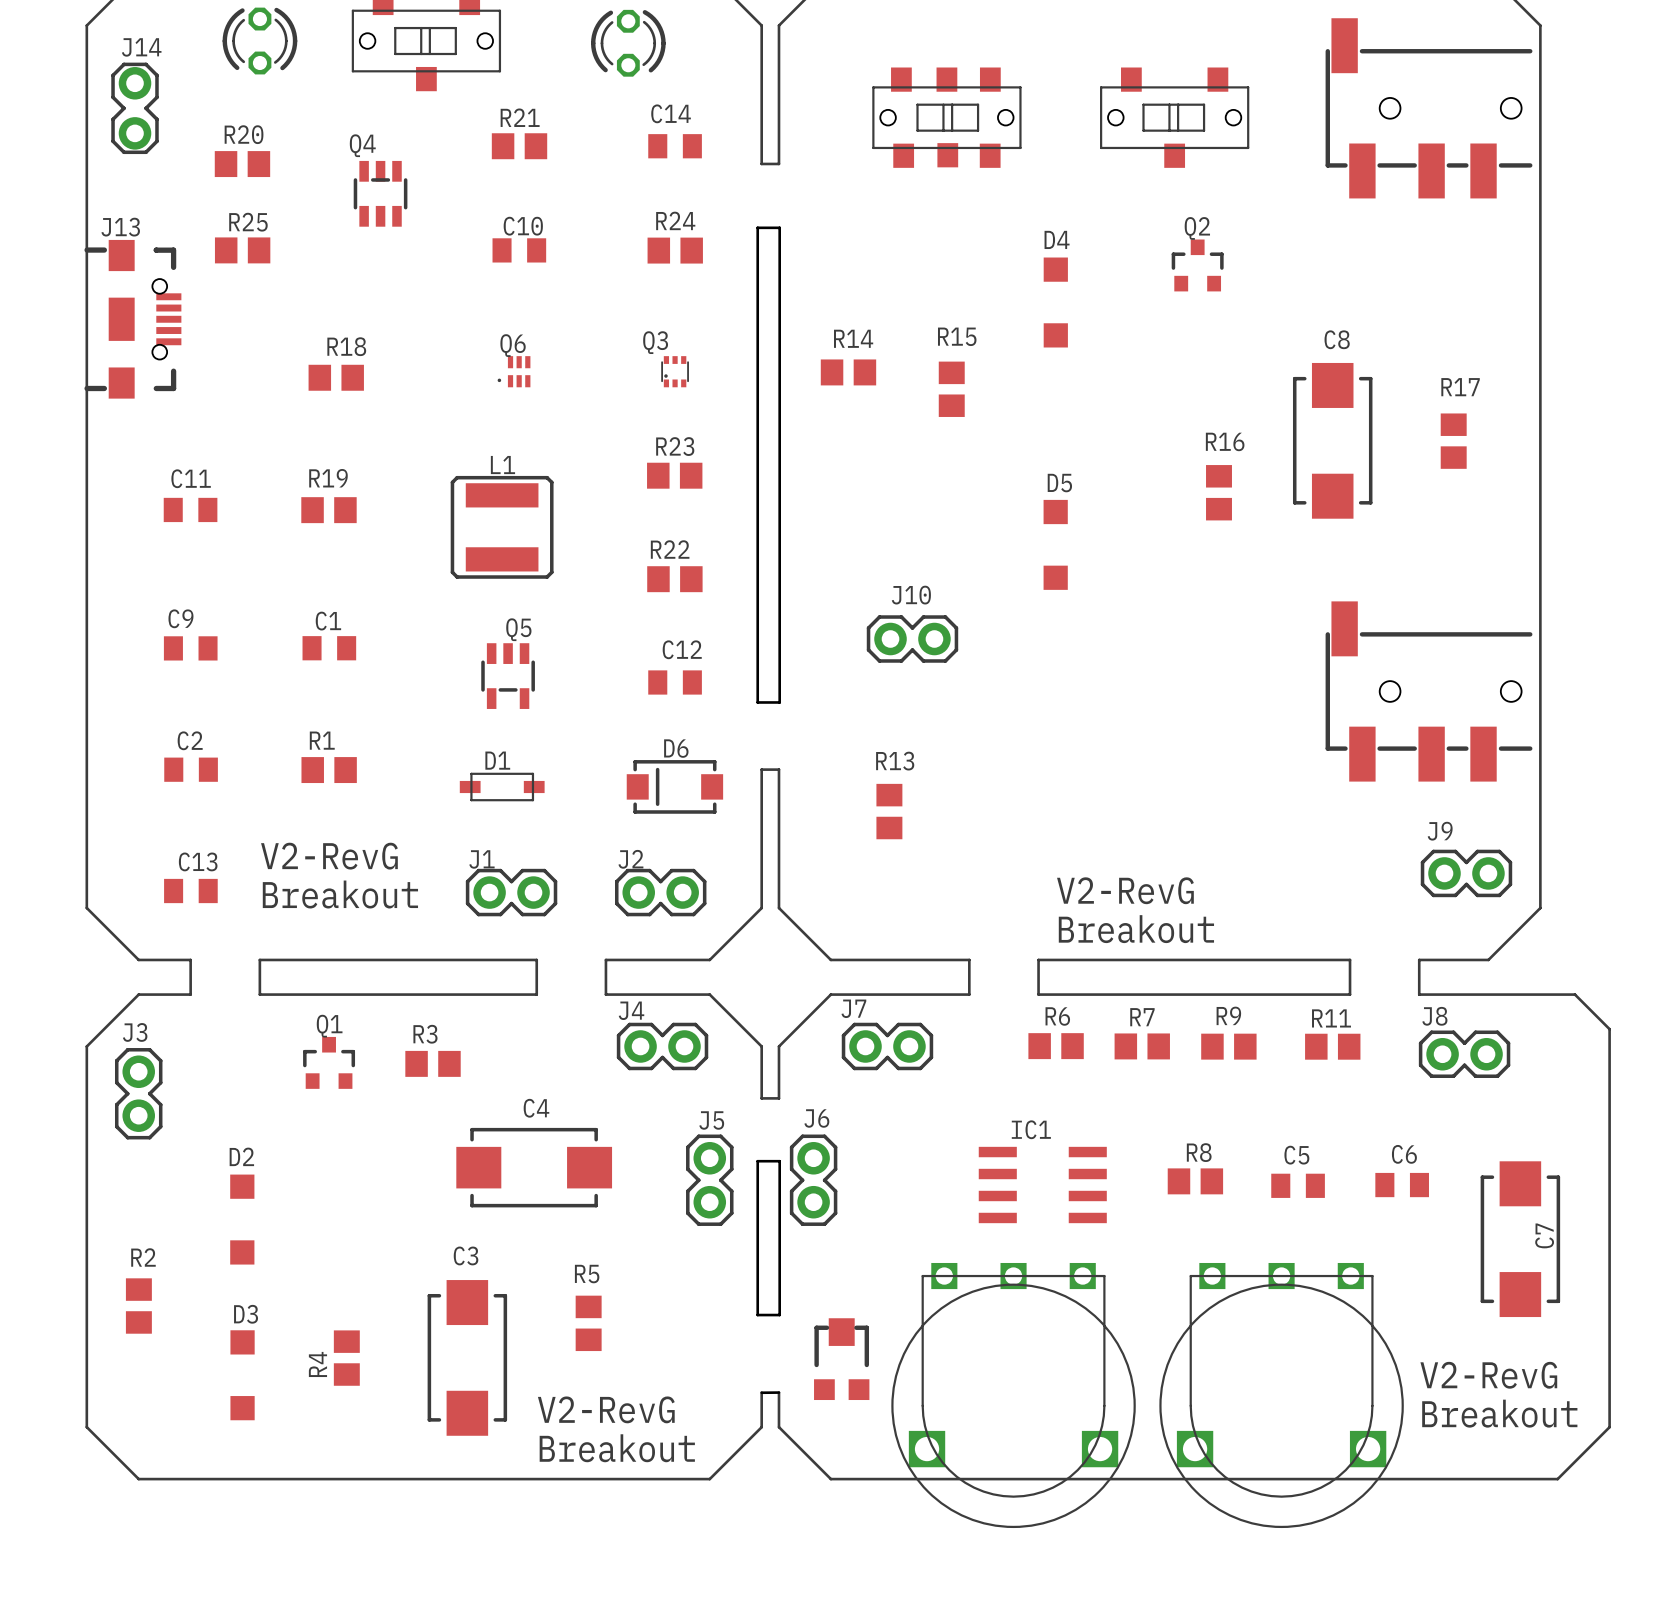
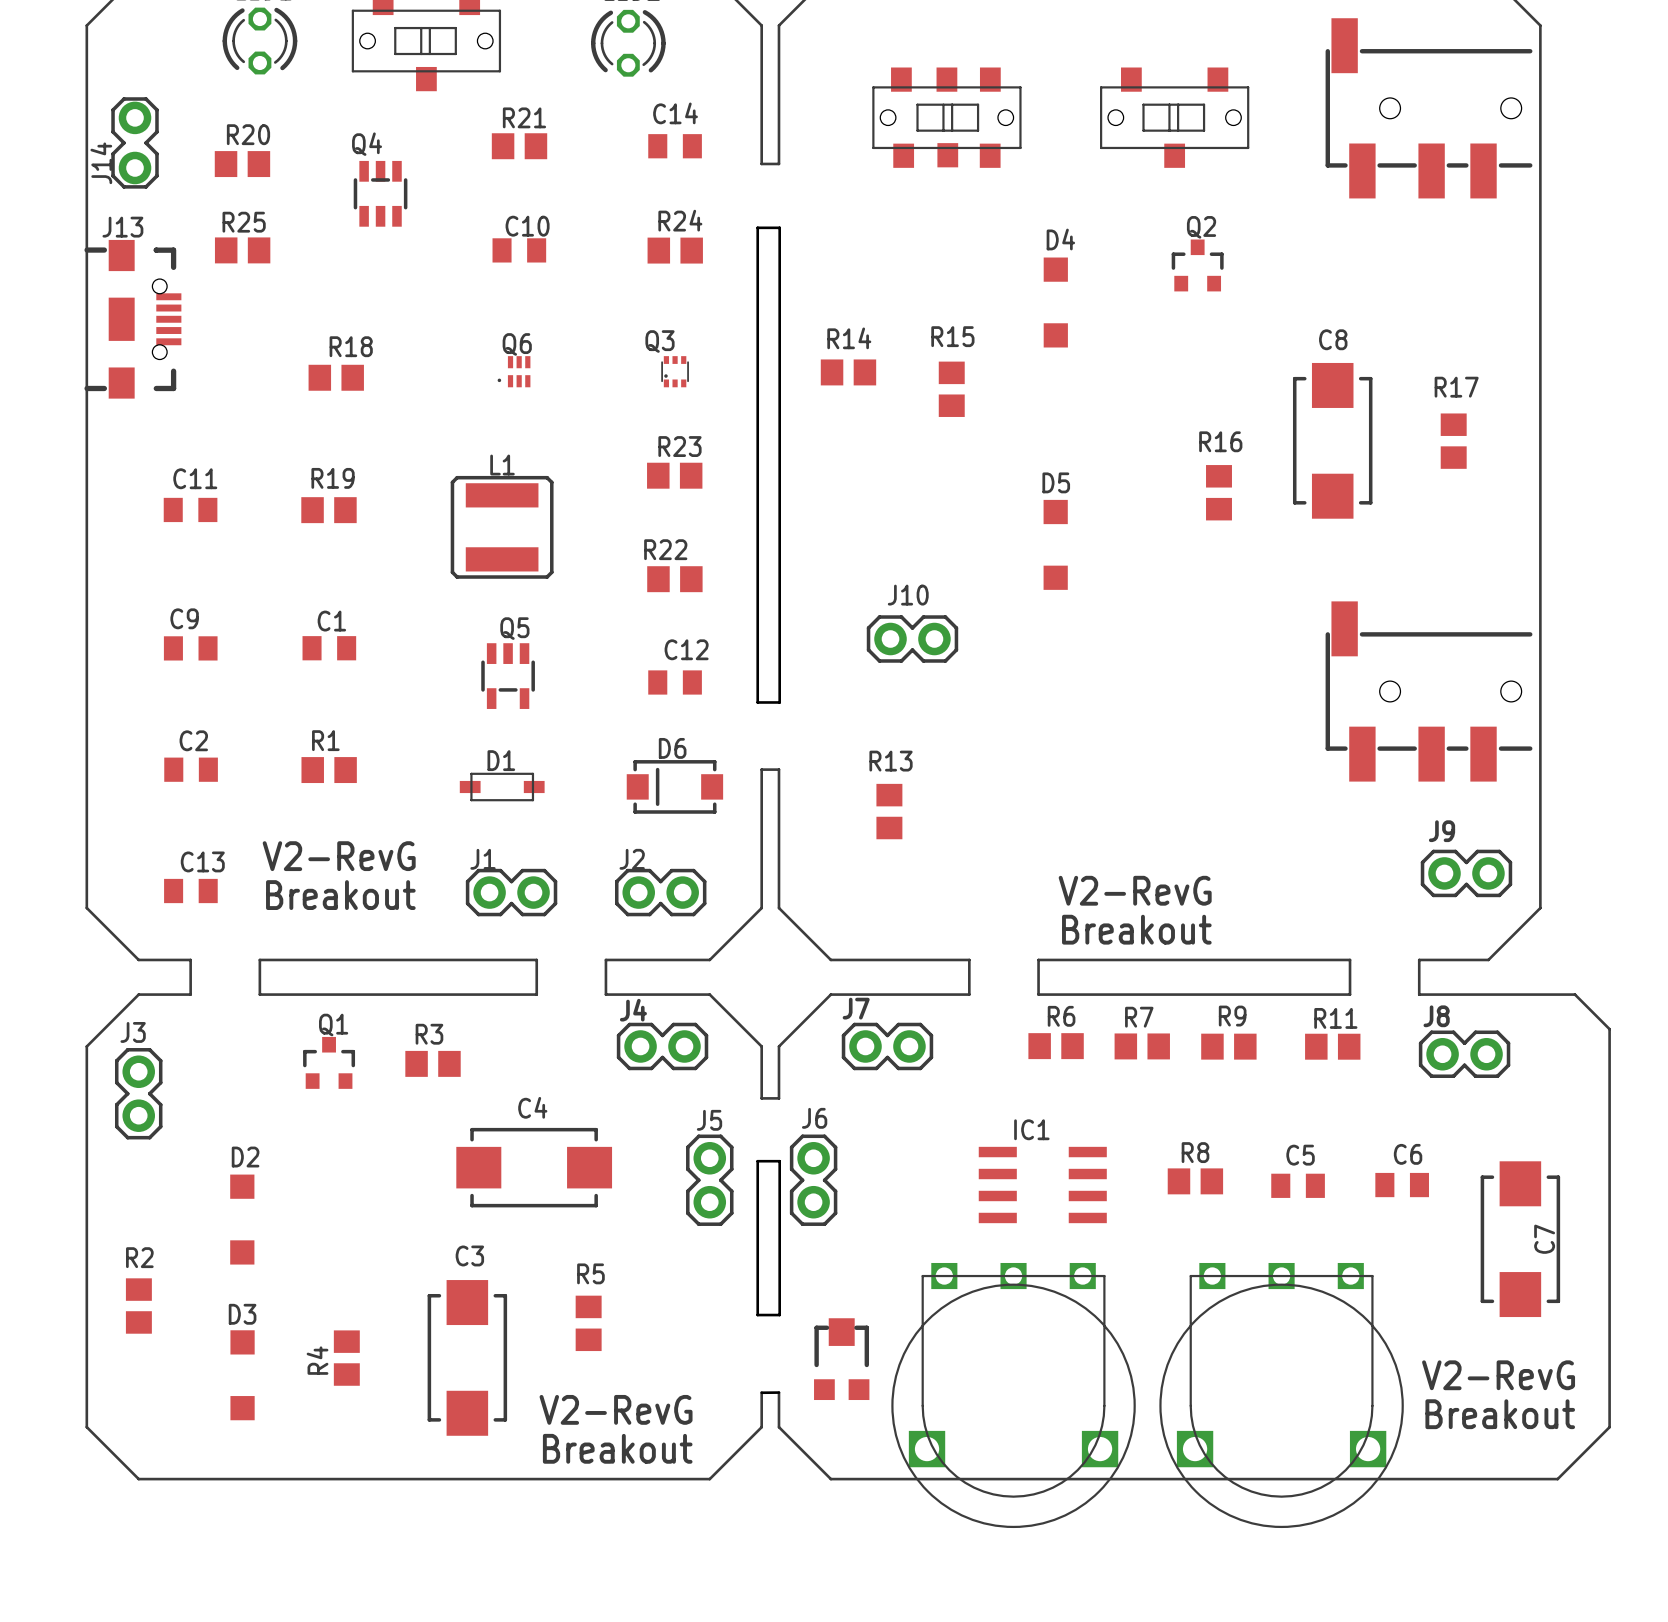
J14 name rotation: 0° (141, 47) -> 90° counterclockwise (101, 163)
J14 name position: J14 (141, 47) -> J14 (101, 163)
J14 position: (135, 108) -> (135, 142)

